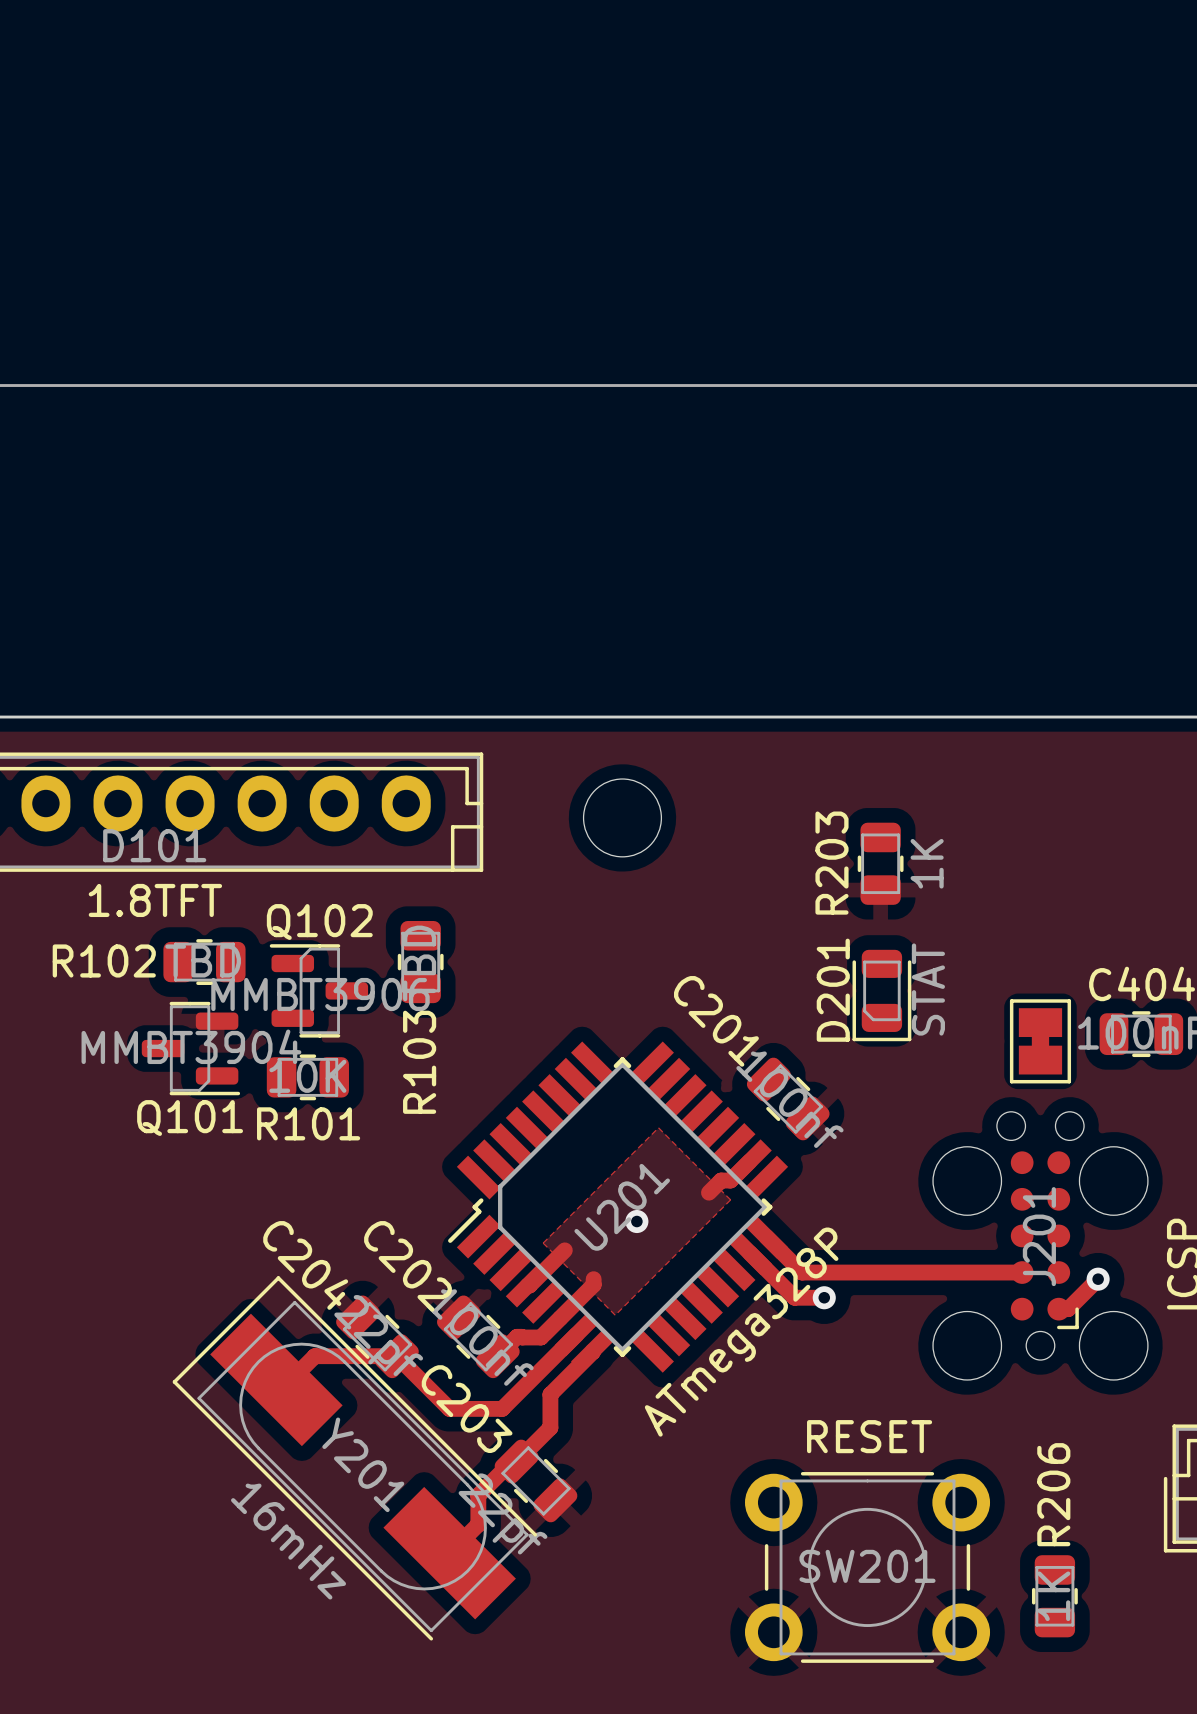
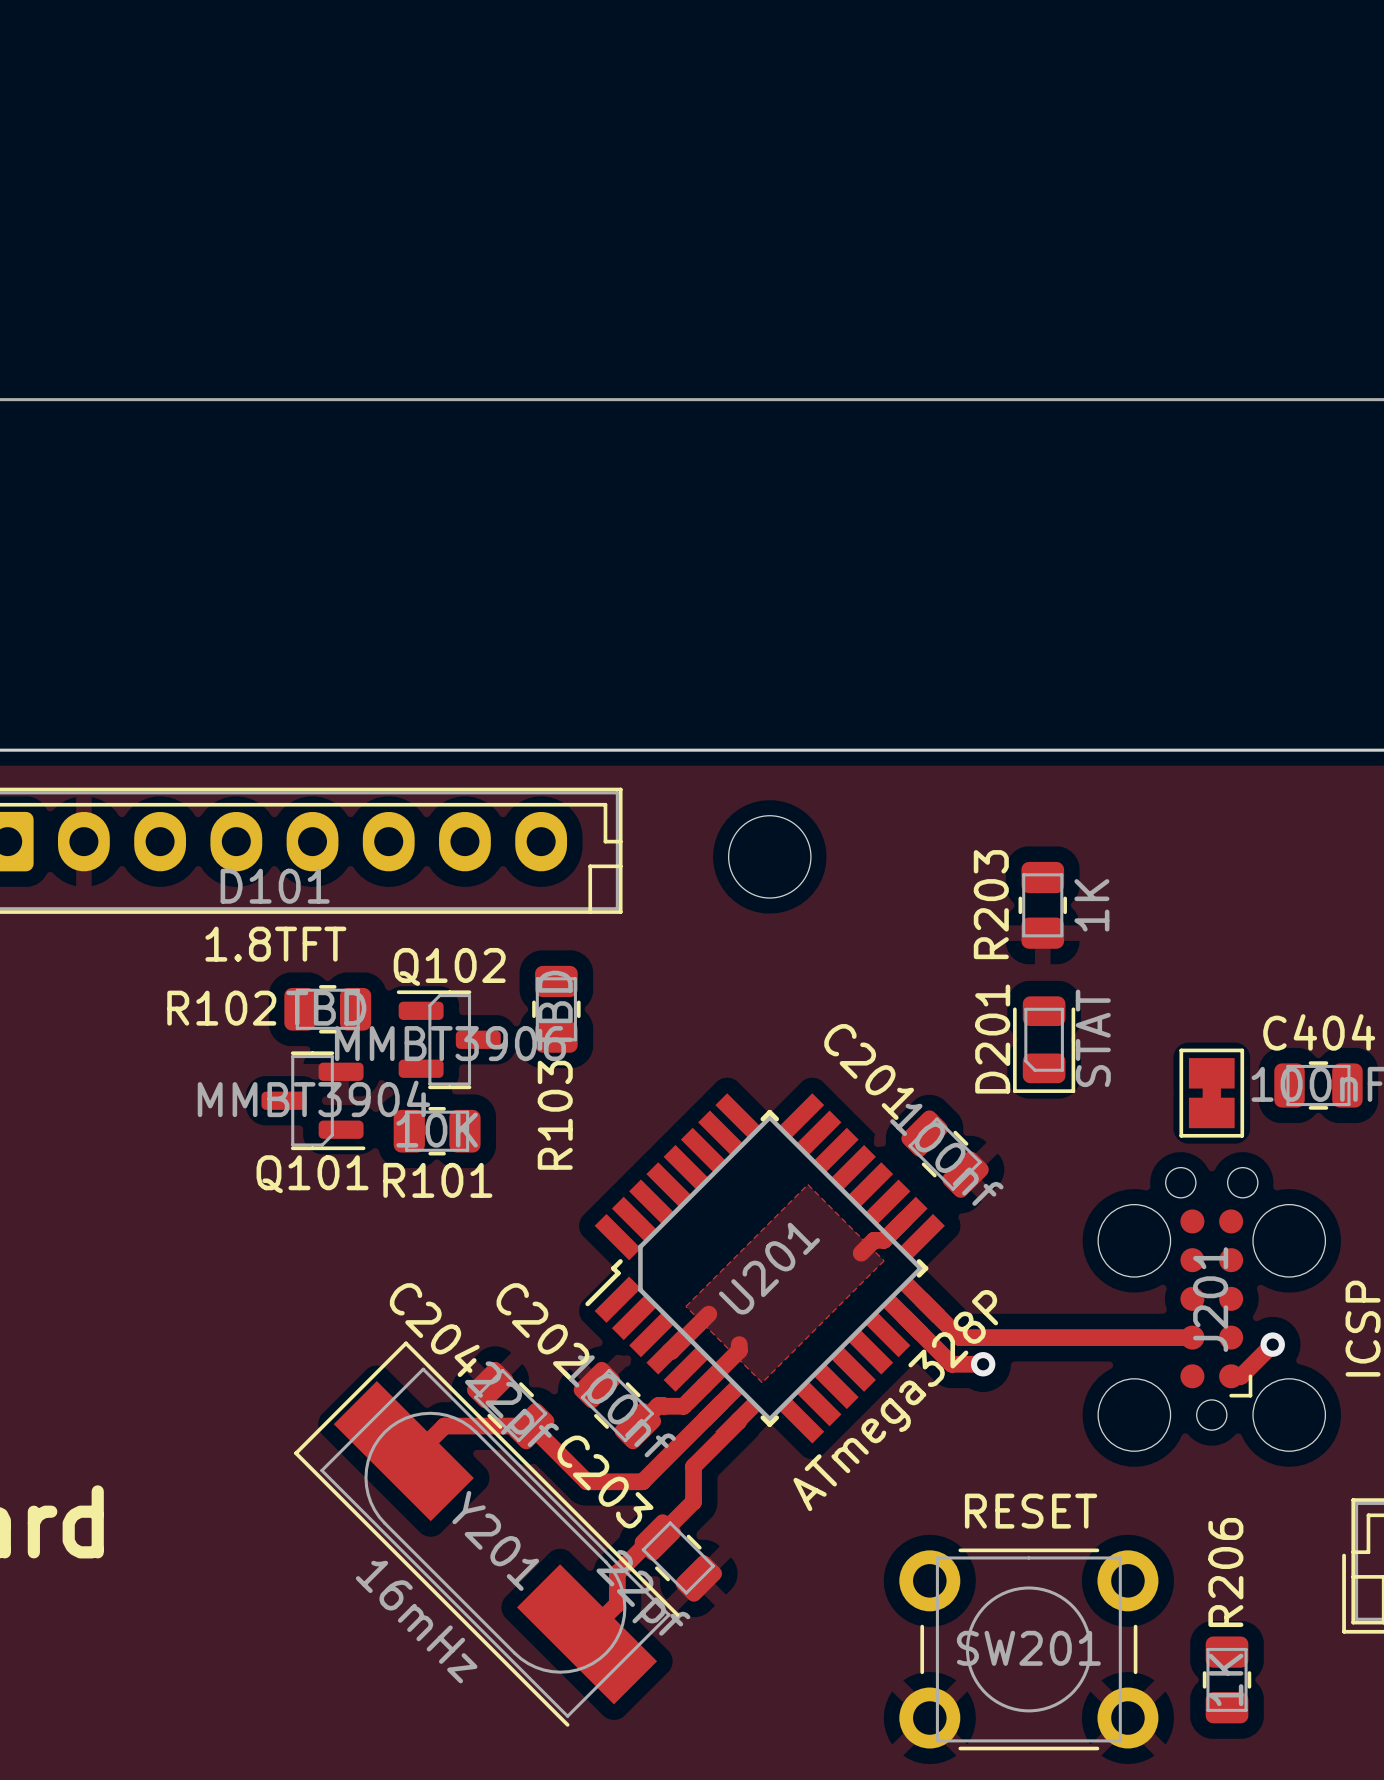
via: (636, 1221) -> none

